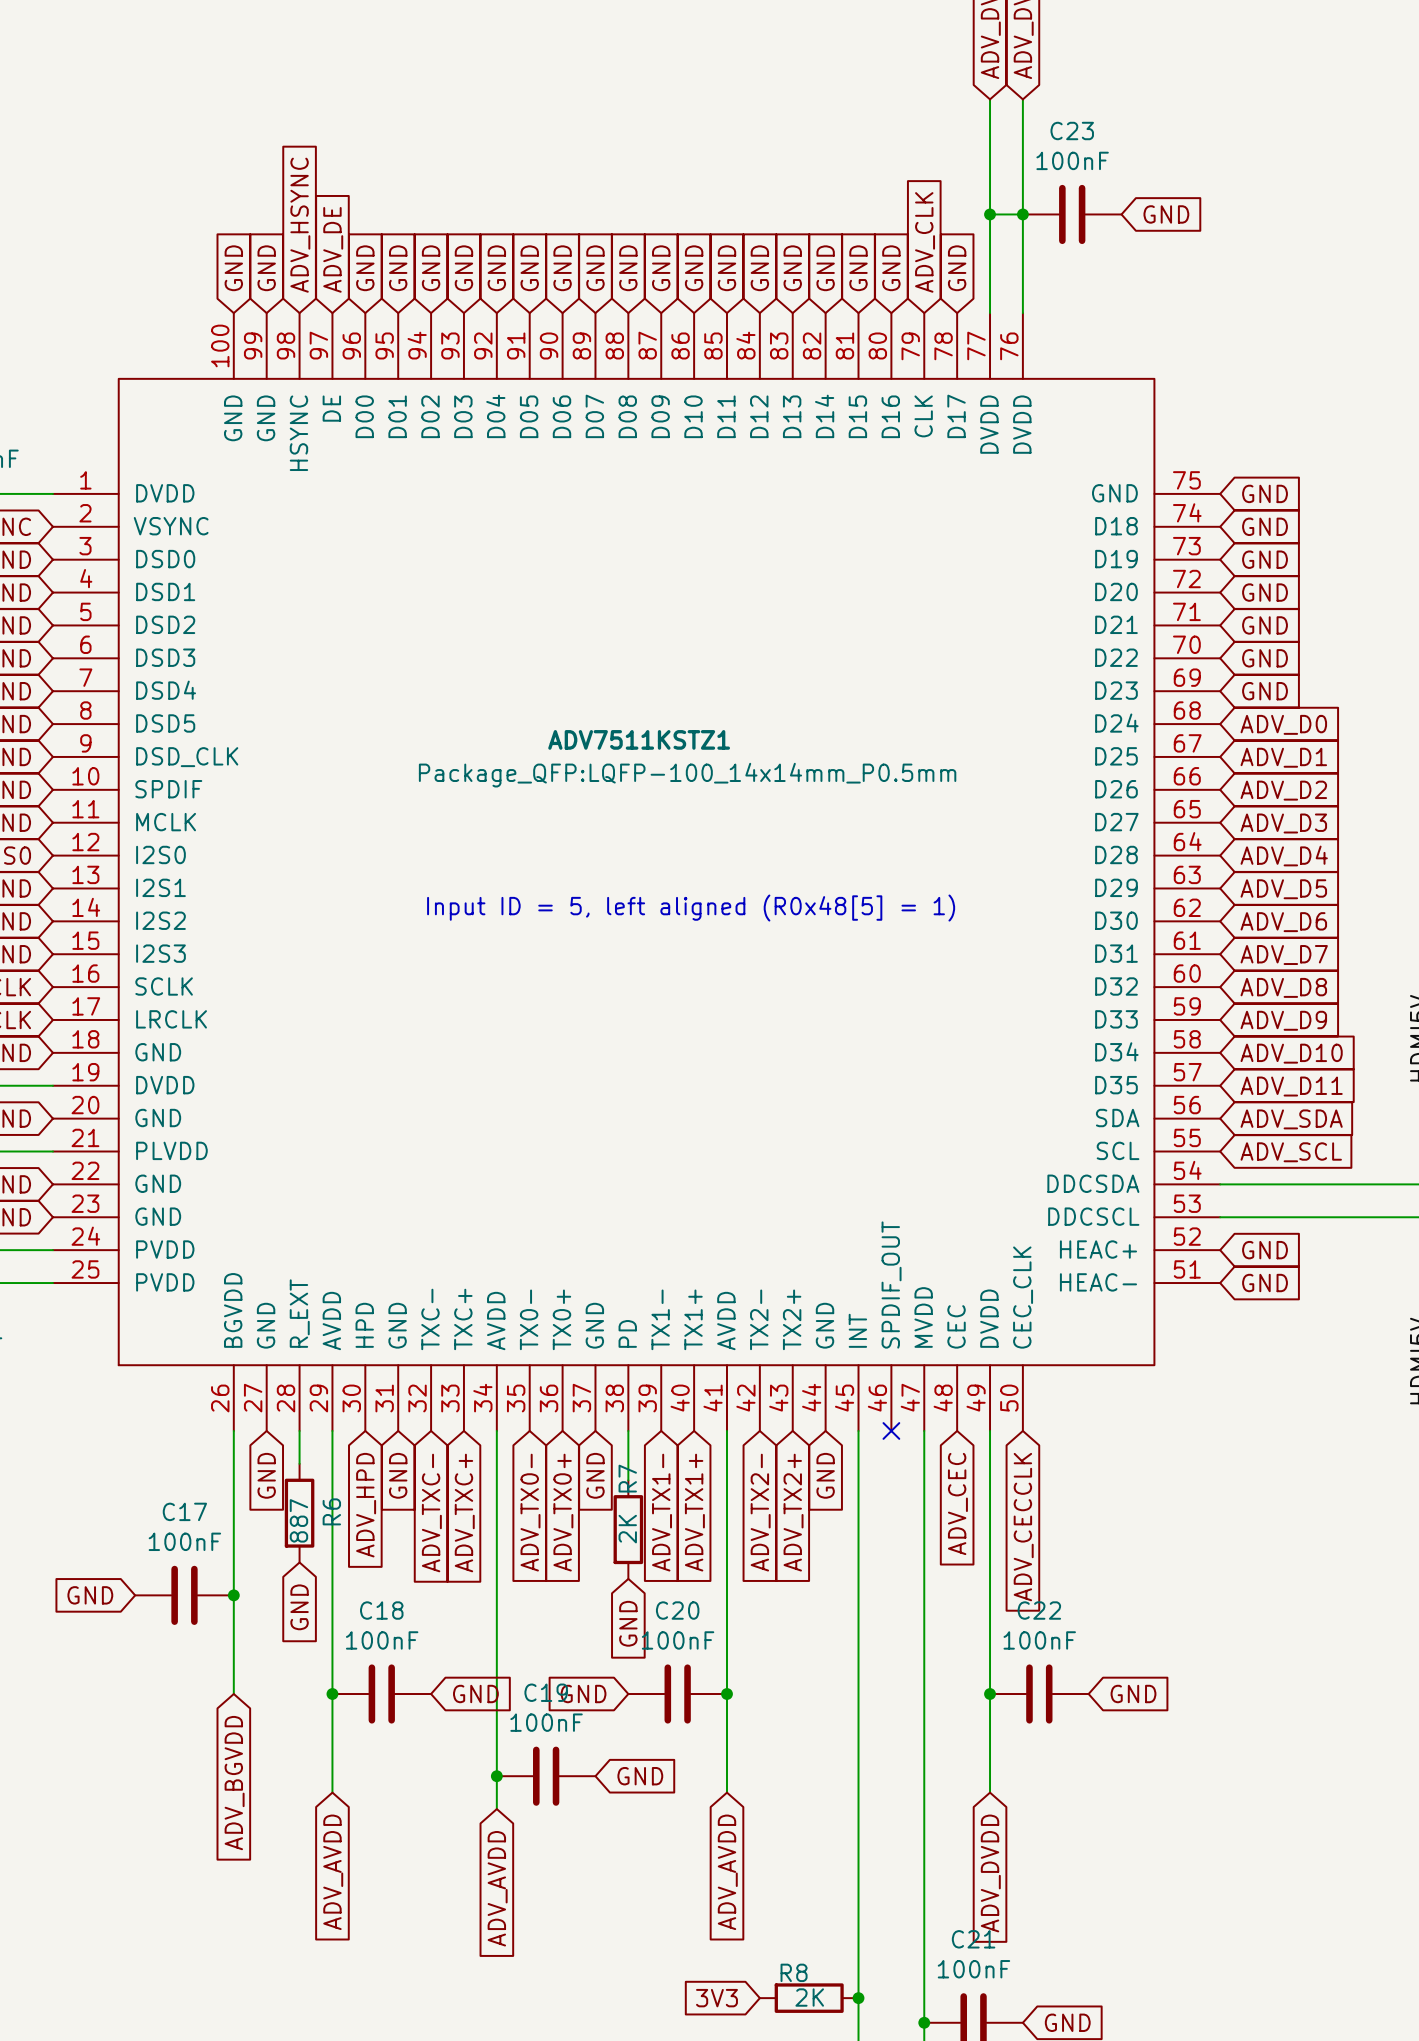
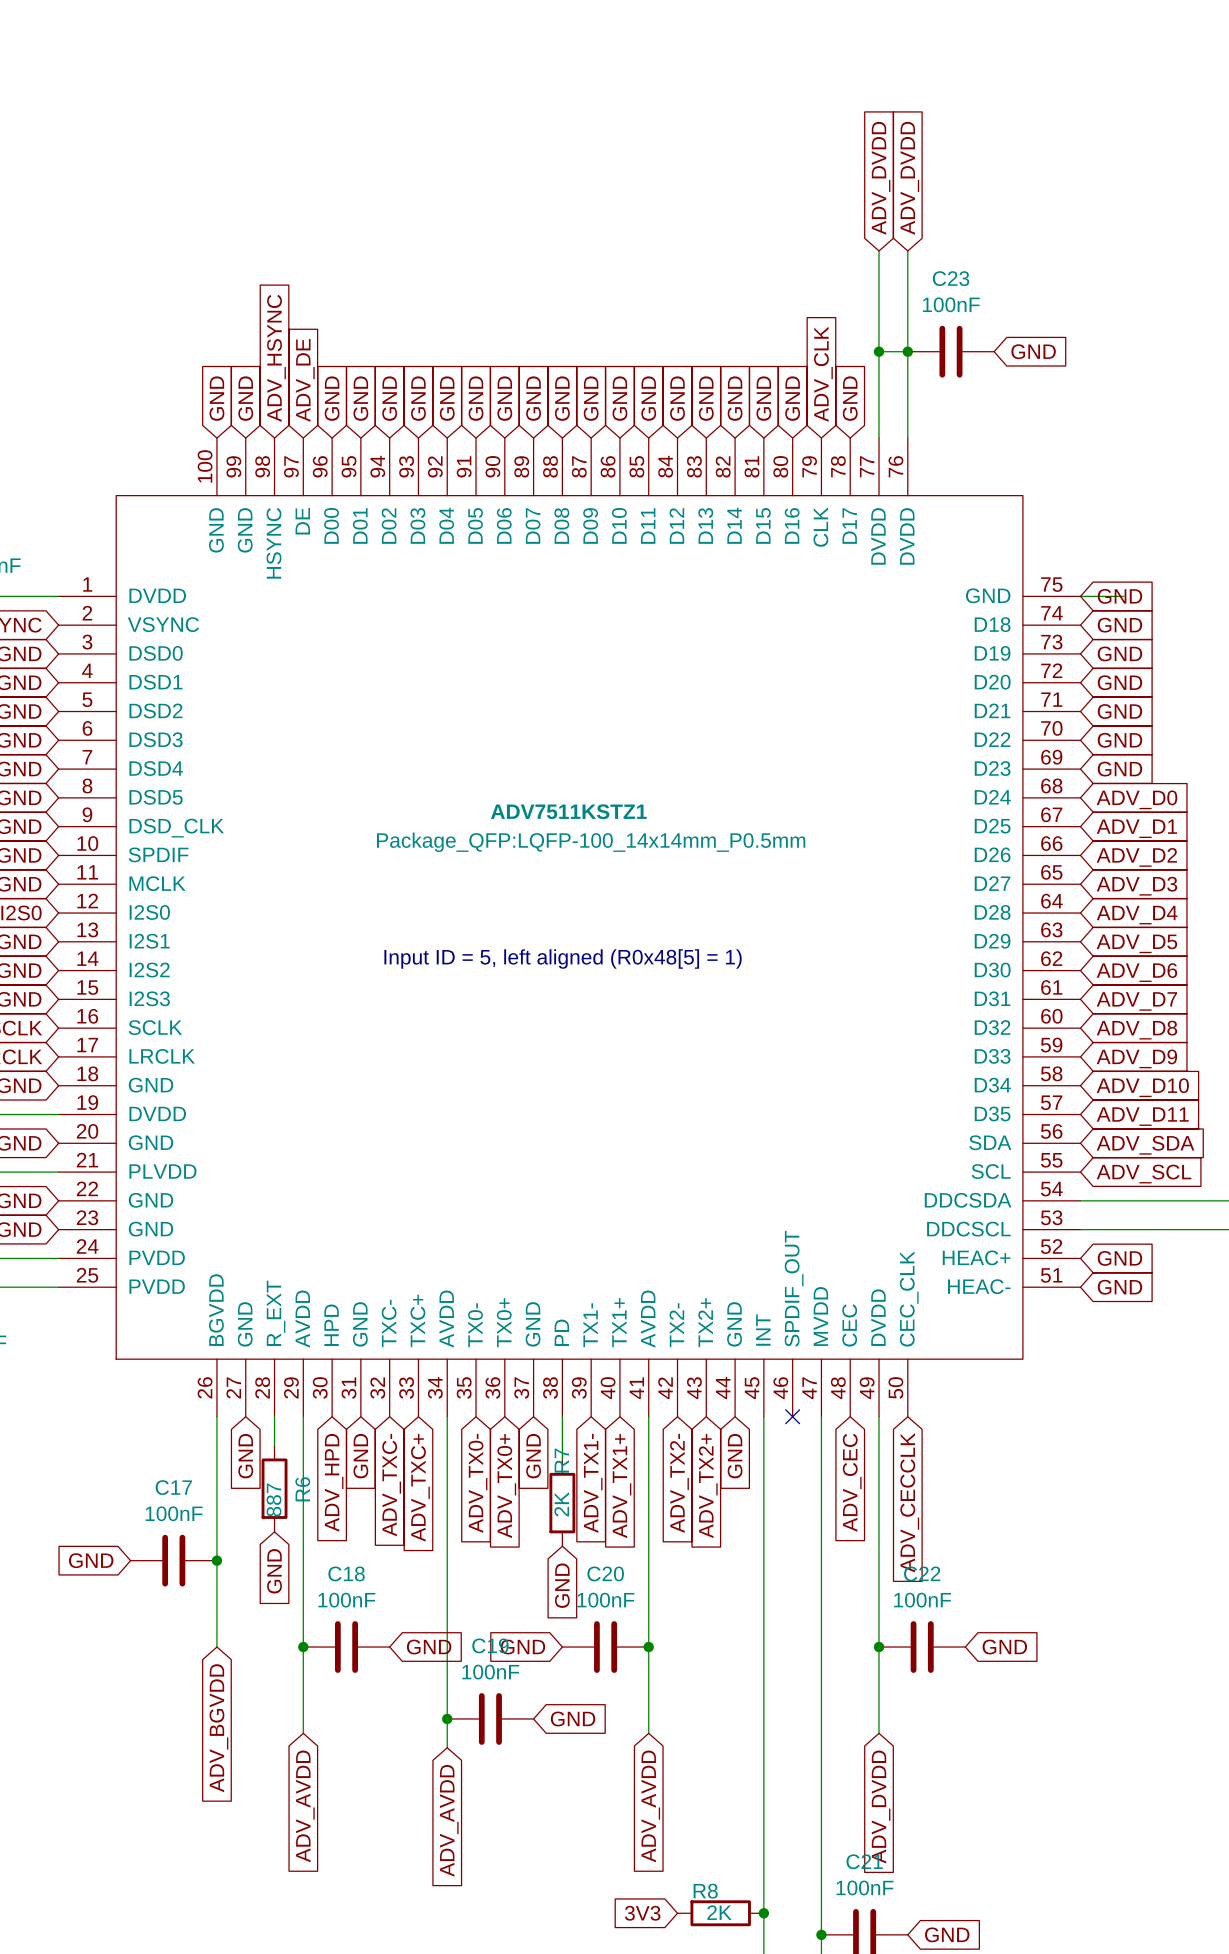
wire: none -> (1080, 596) (1123, 596)

